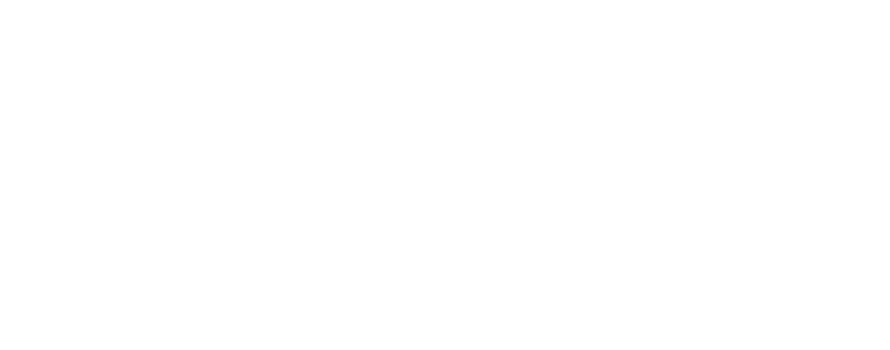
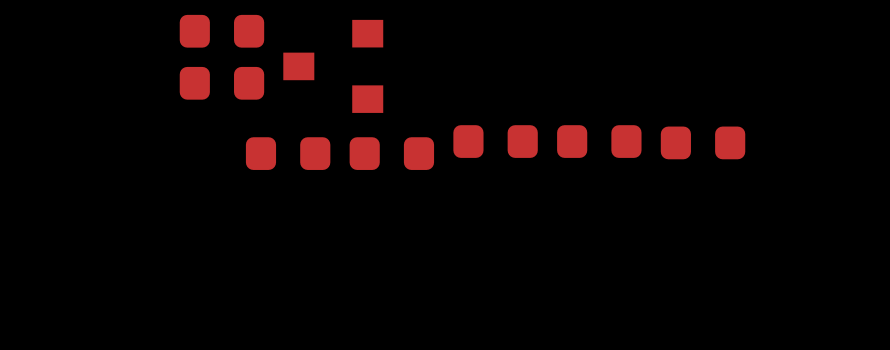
part: none -> (221, 31)
part: none -> (333, 66)
part: none -> (221, 83)
part: none -> (495, 141)
part: none -> (599, 141)
part: none -> (703, 142)
part: none -> (288, 153)
part: none -> (391, 153)

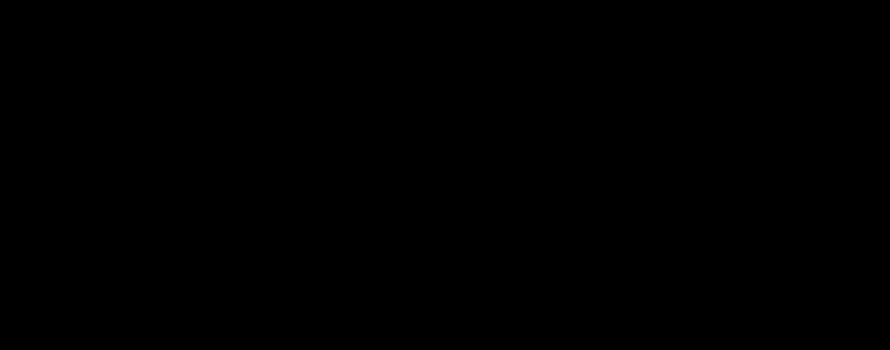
part: (221, 31) -> none
part: (333, 66) -> none
part: (221, 83) -> none
part: (495, 141) -> none
part: (599, 141) -> none
part: (703, 142) -> none
part: (288, 153) -> none
part: (391, 153) -> none

